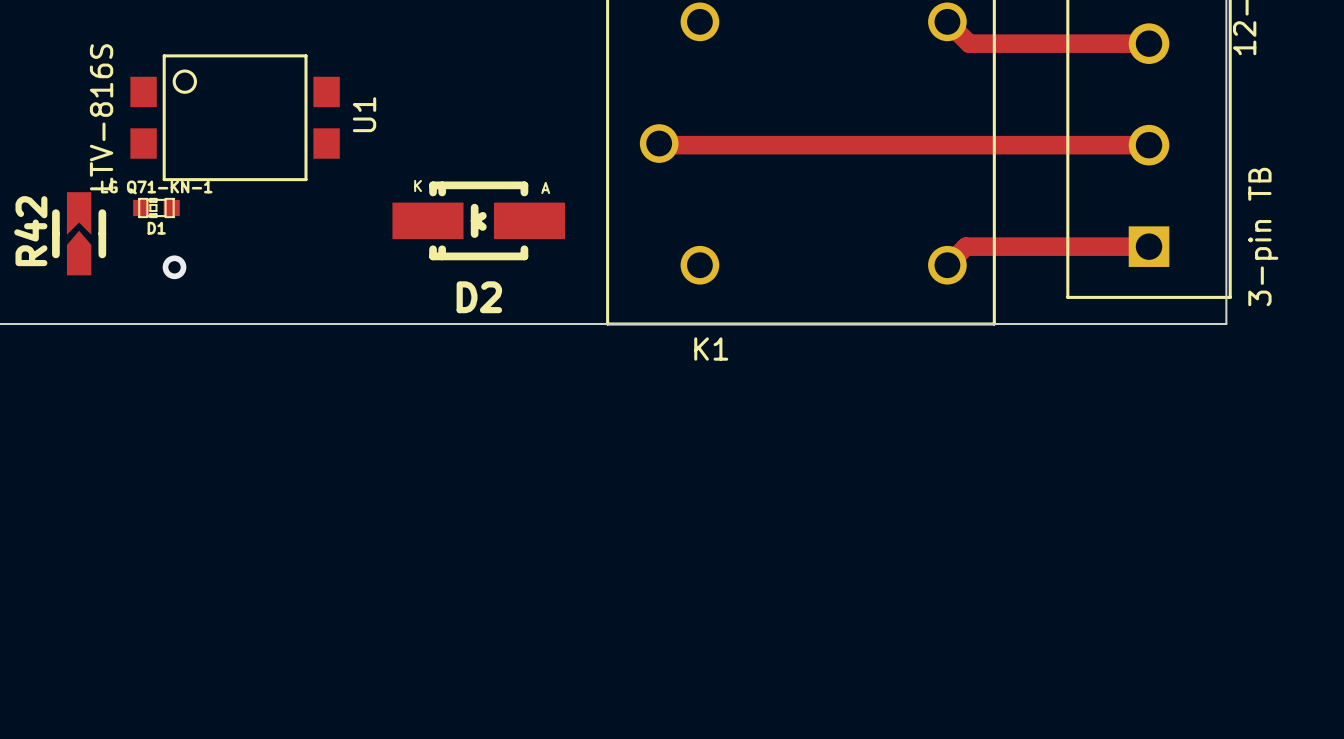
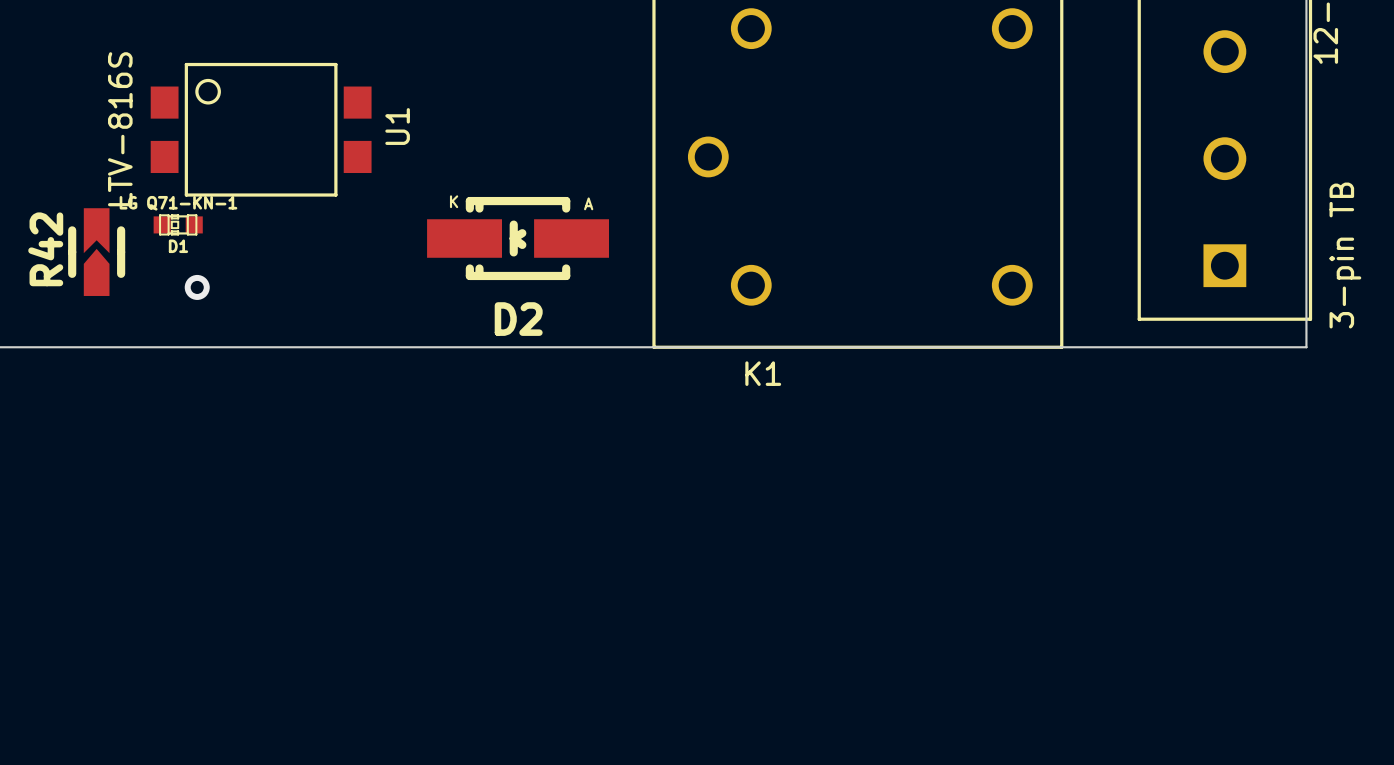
track: (947, 21) (969, 43) (1149, 43) -> none
track: (659, 143) (660, 145) (1149, 145) -> none
track: (1149, 246) (965, 246) (947, 265) -> none

